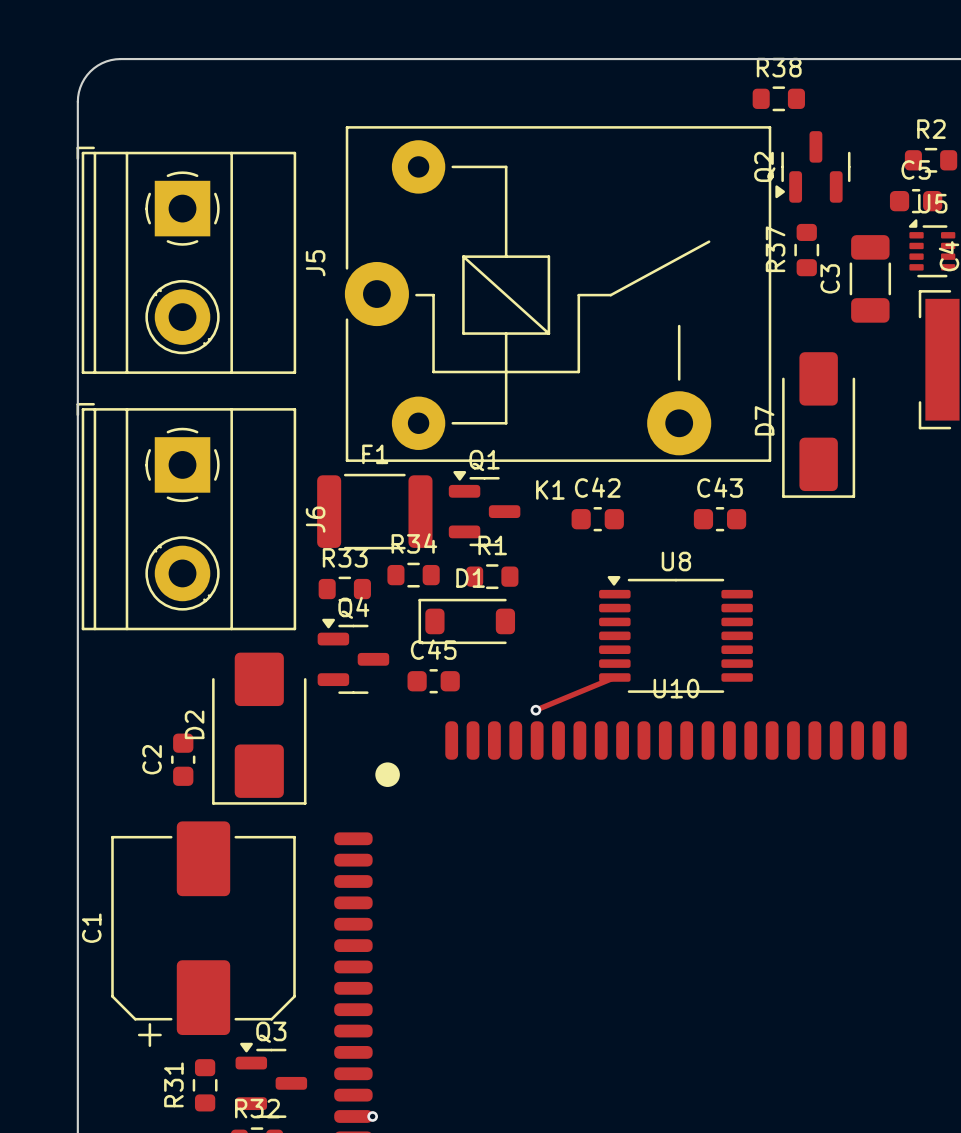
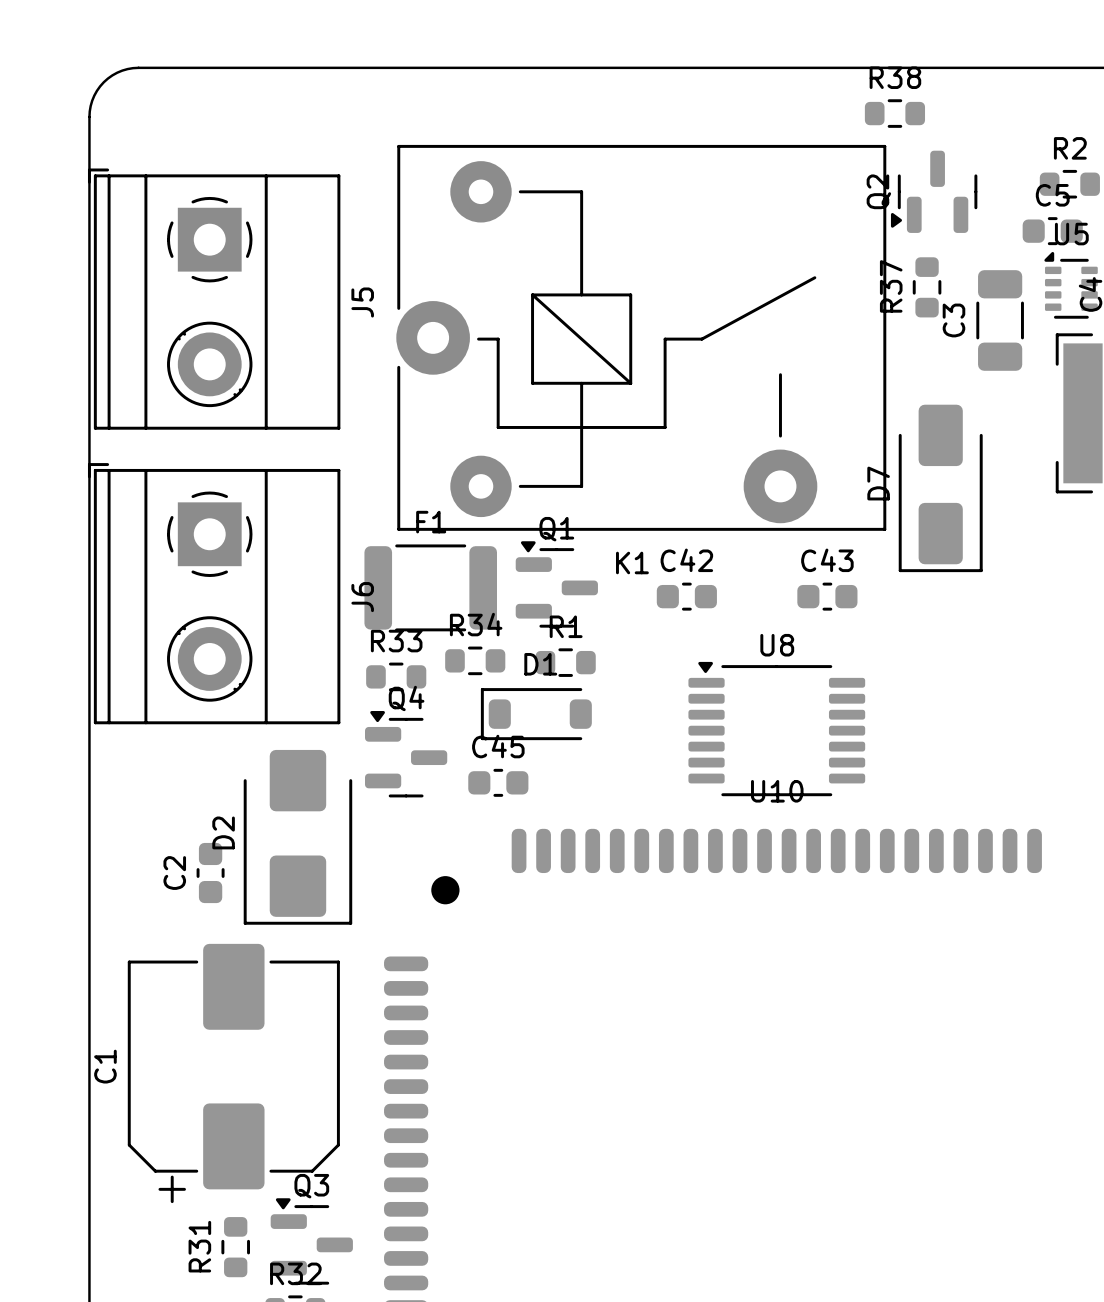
track: (614, 677) (535, 710) -> none
via: (535, 710) -> none
via: (372, 1116) -> none

